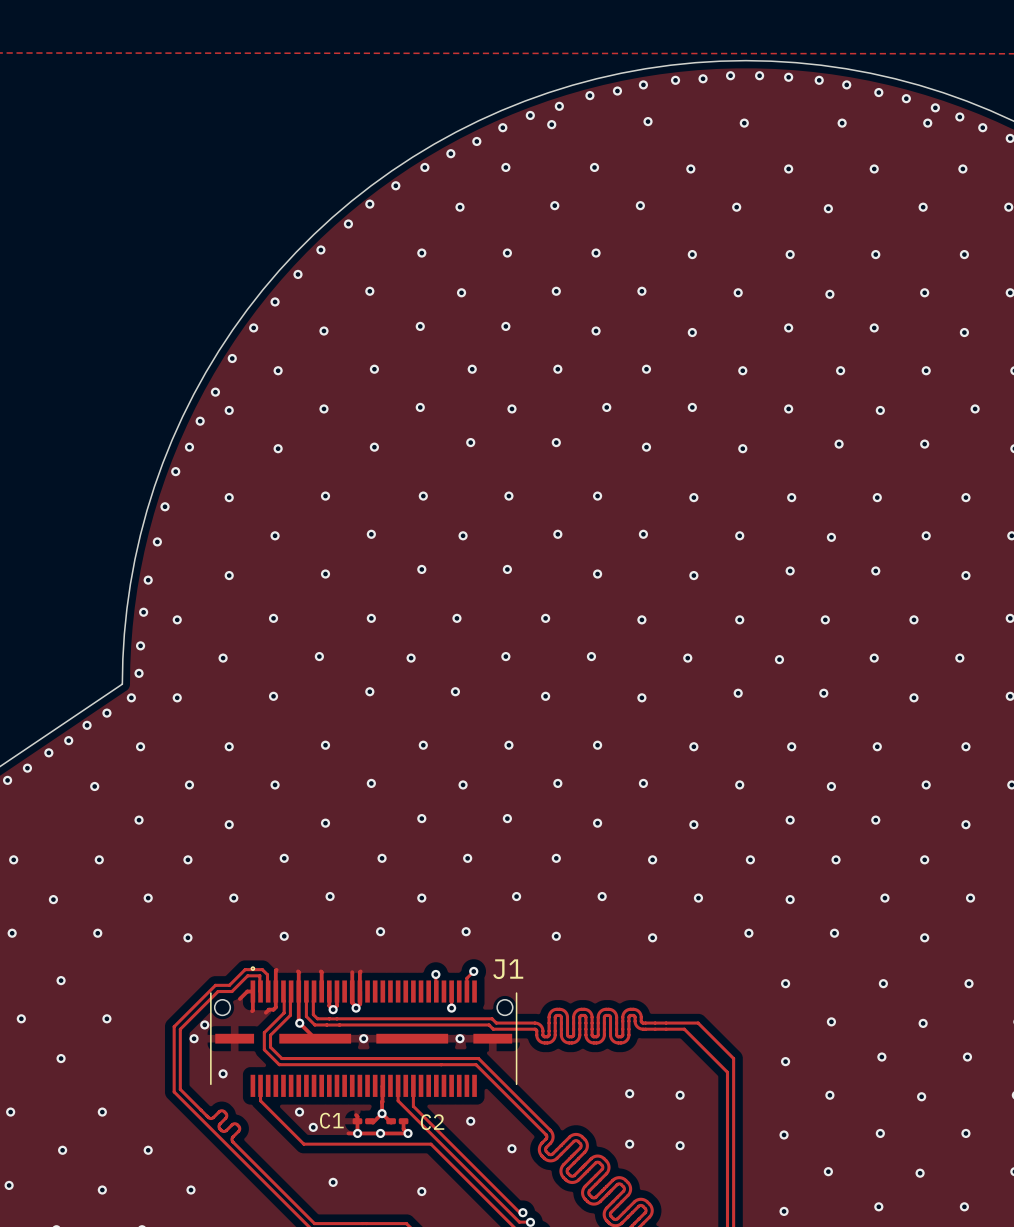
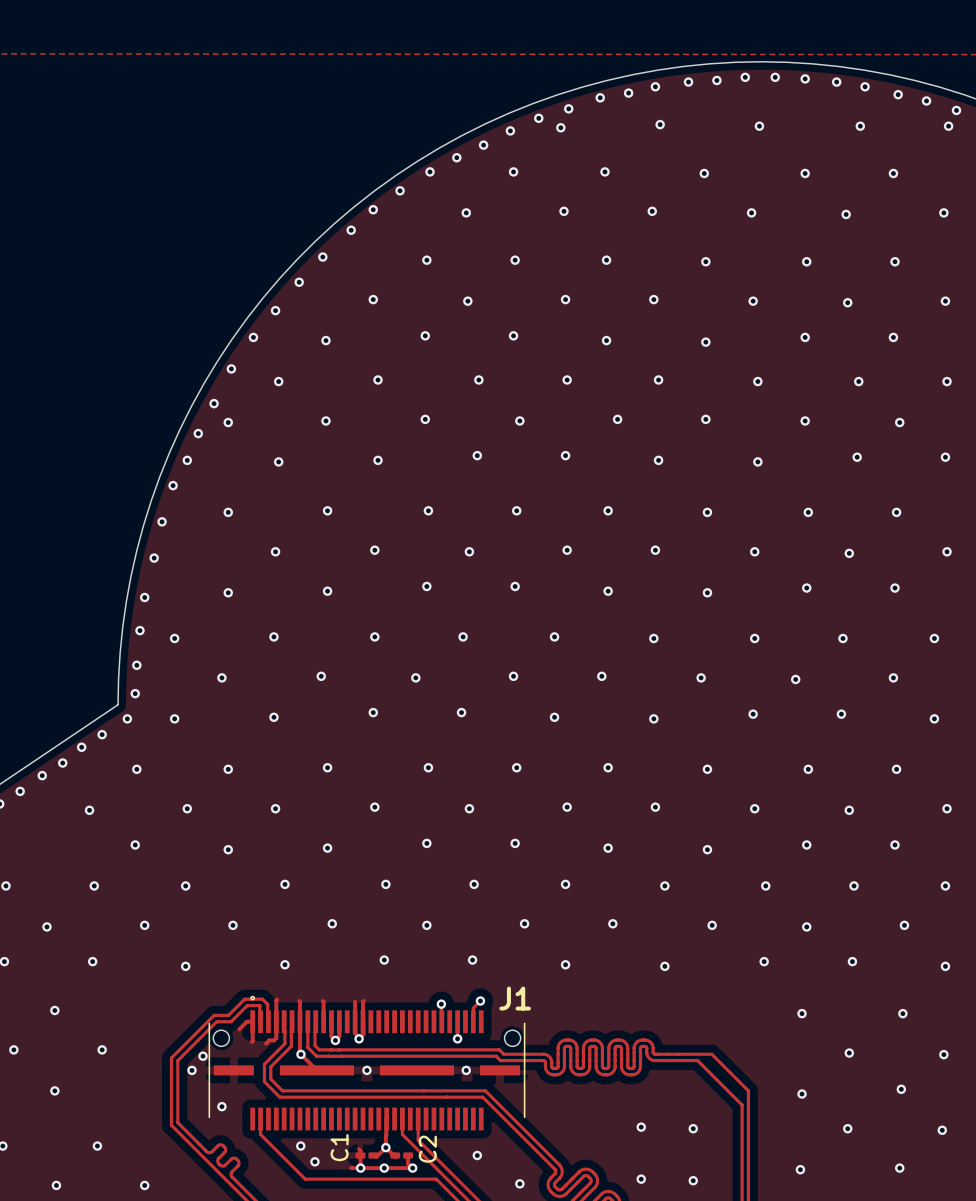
C1 name rotation: 0° (331, 1120) -> 90° counterclockwise (339, 1147)
C2 name rotation: 0° (432, 1122) -> 90° counterclockwise (427, 1149)

